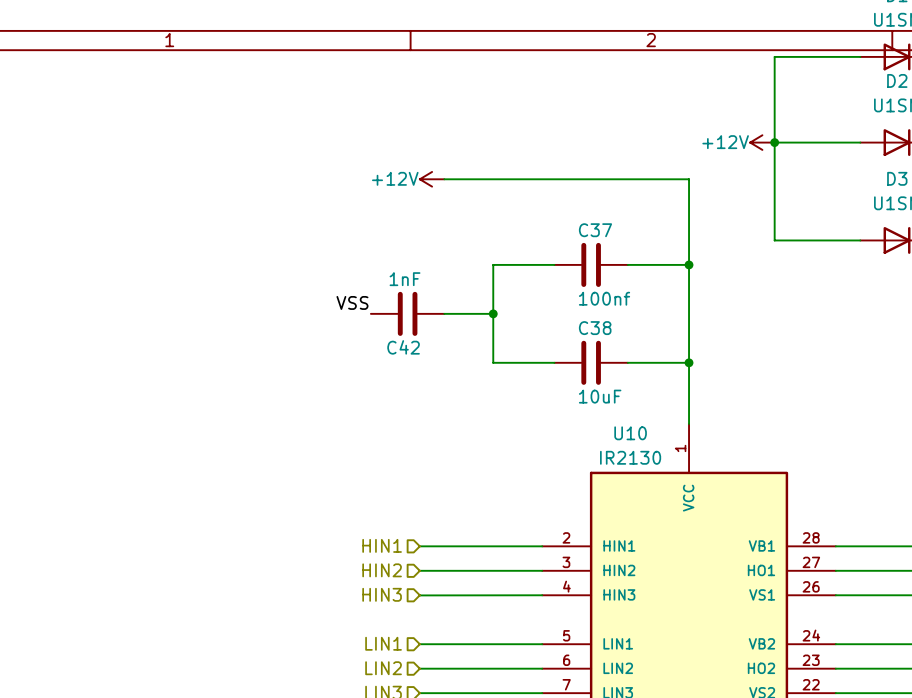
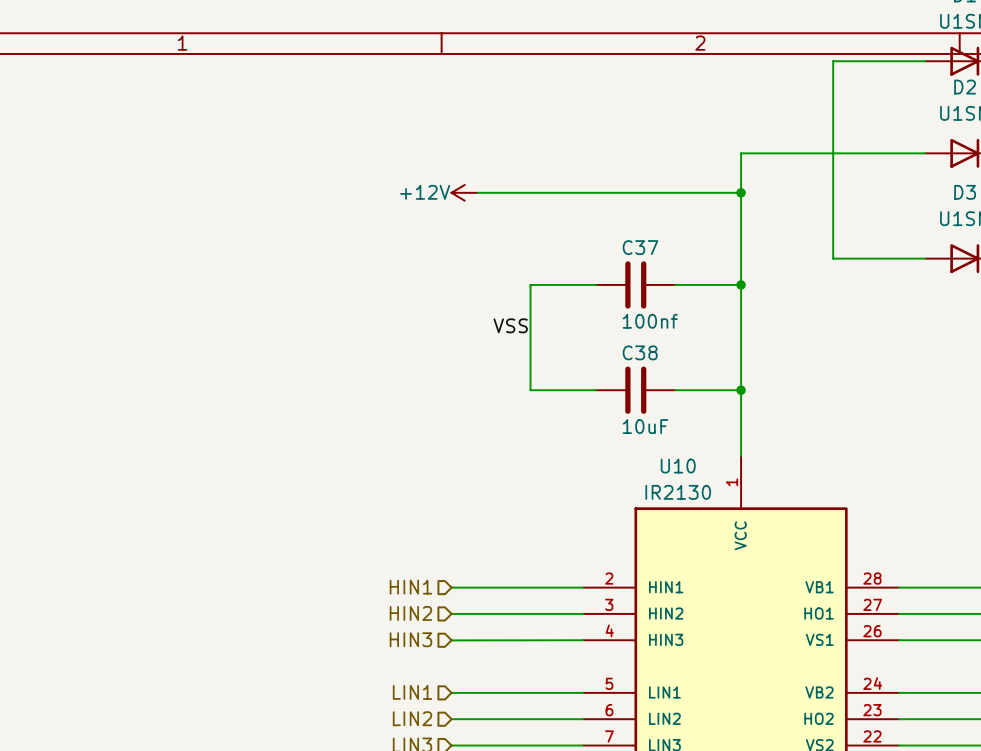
power symbol: +12V (762, 142) -> none
wire: none -> (833, 153) (741, 153) (741, 192)
junction: (774, 142) -> none
junction: none -> (741, 192)
label position: VSS (352, 302) -> VSS (510, 325)
C42: 1nF (407, 313) -> none
wire: (444, 313) (493, 313) -> none
junction: (493, 313) -> none

